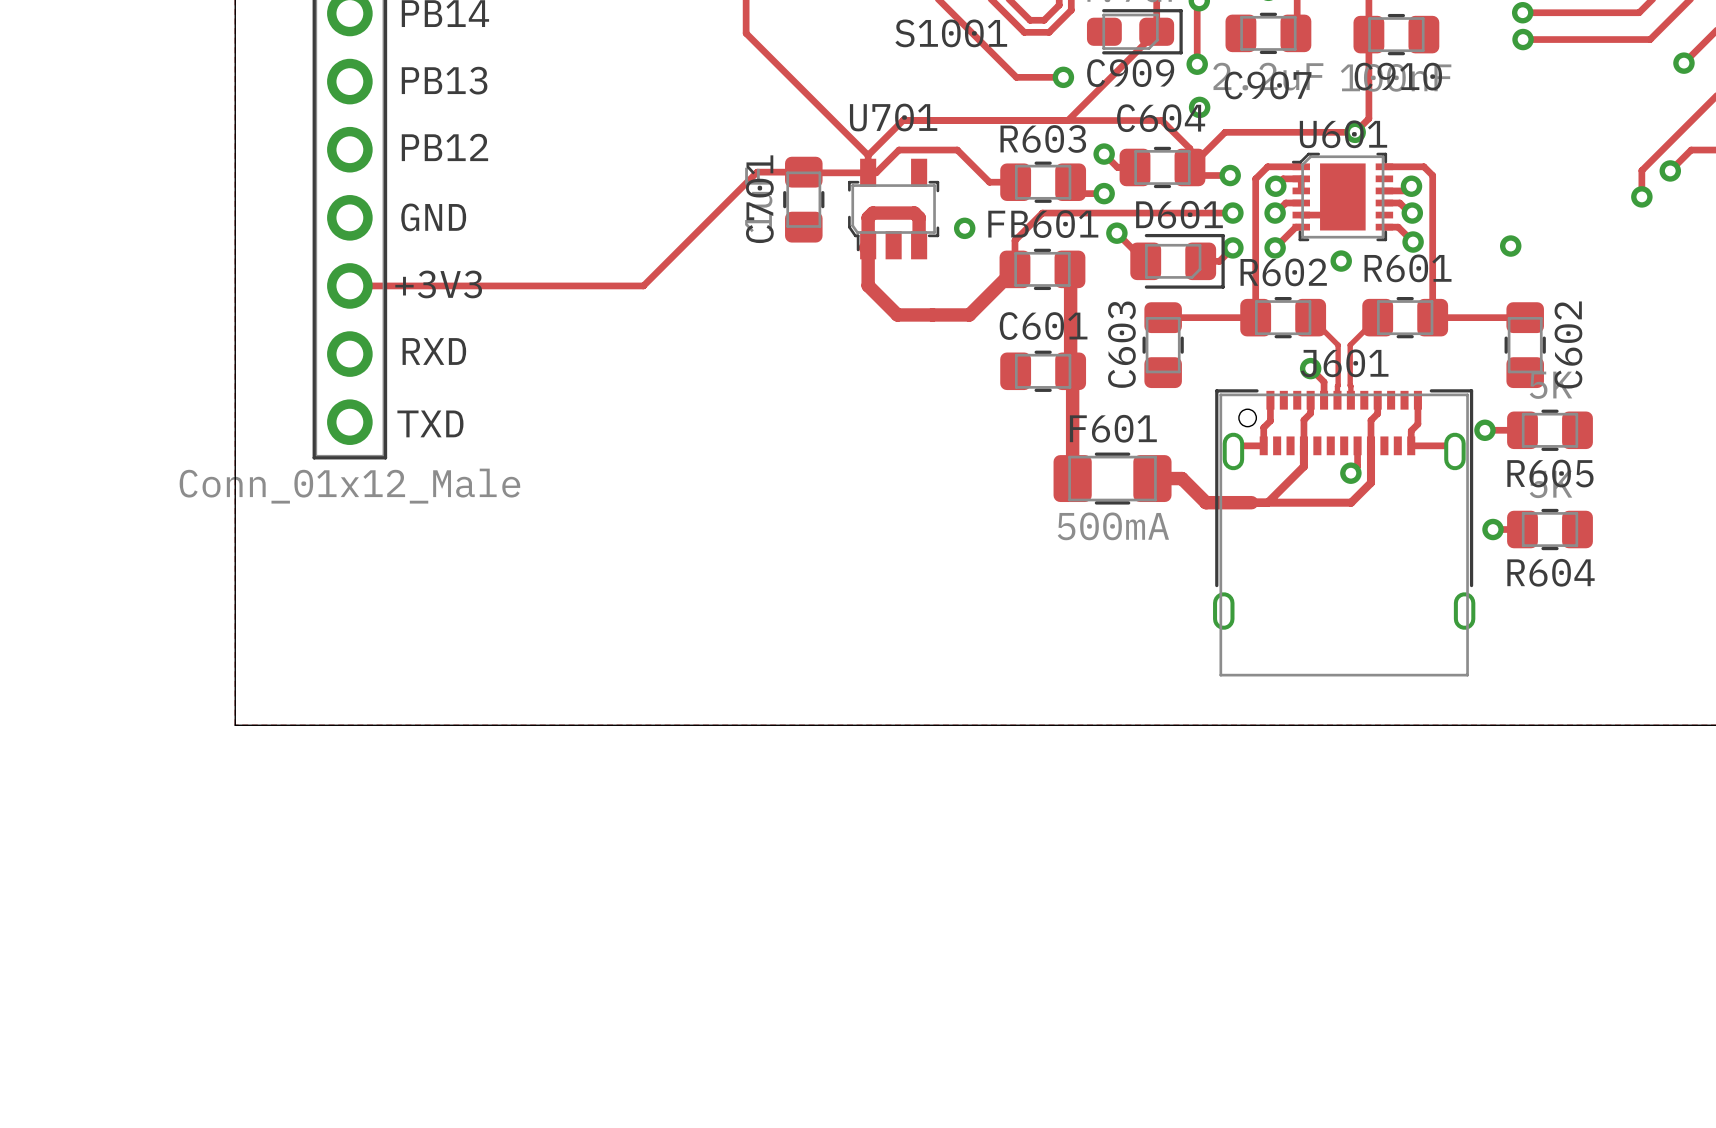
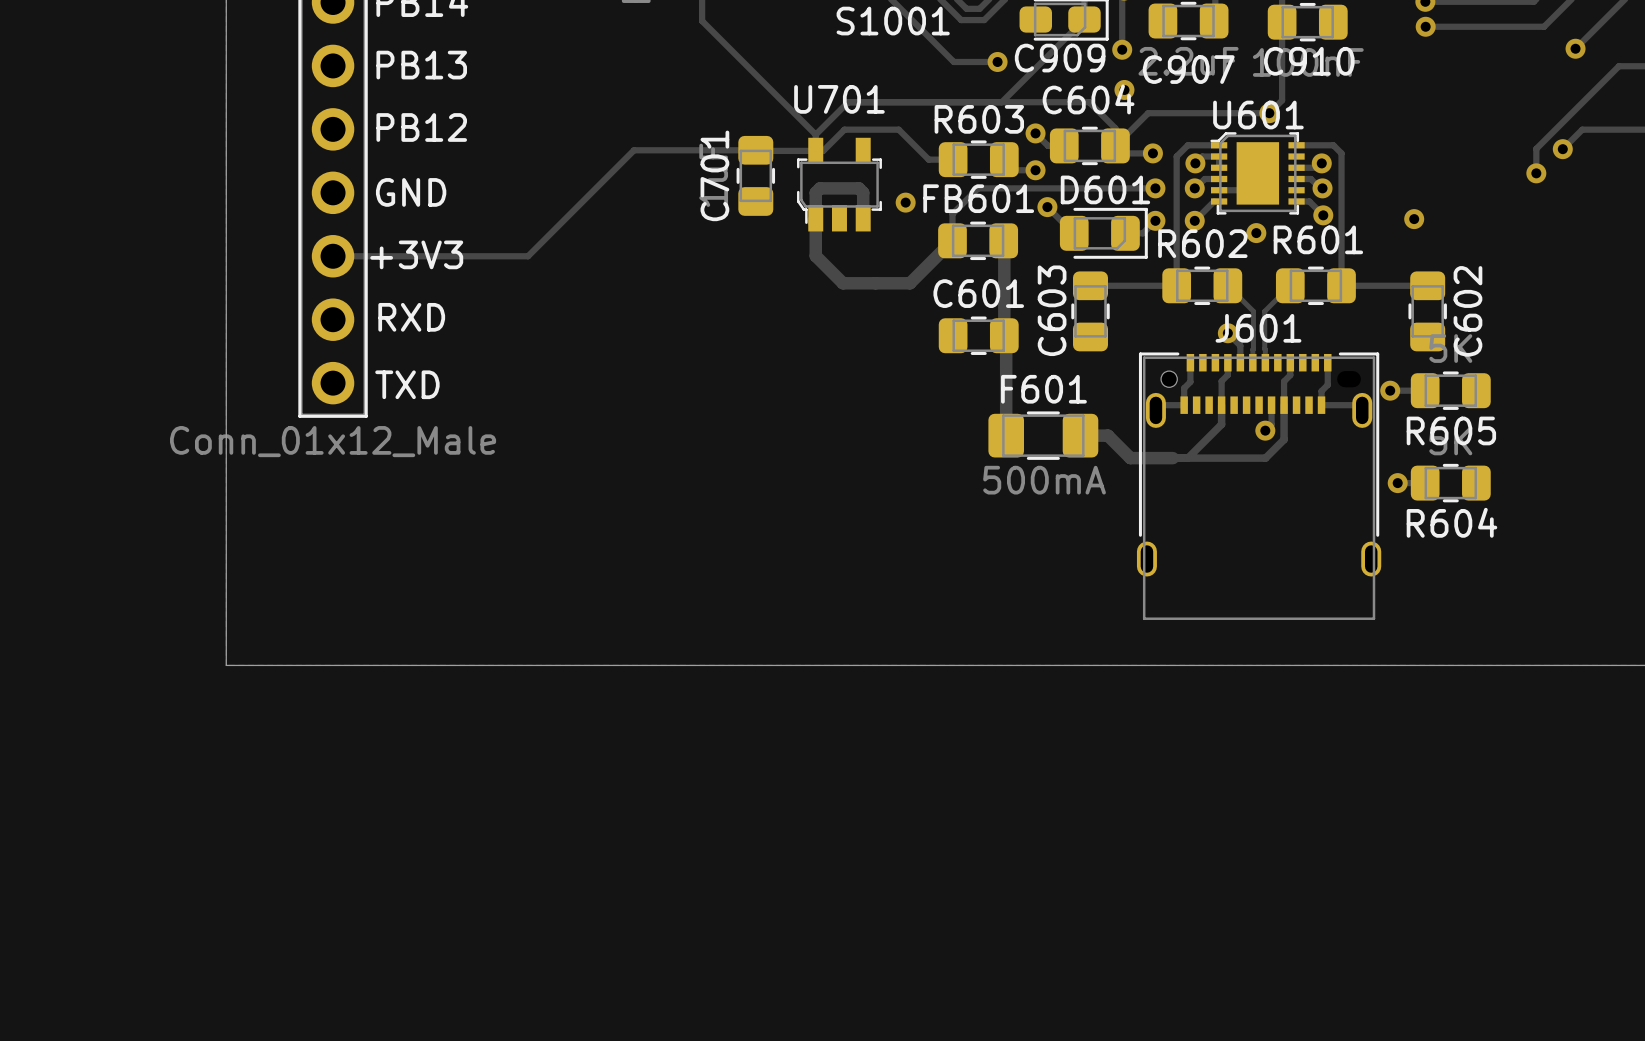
track: (757, 172) (643, 285) (559, 285) -> (712, 150) (634, 150) (528, 256)

